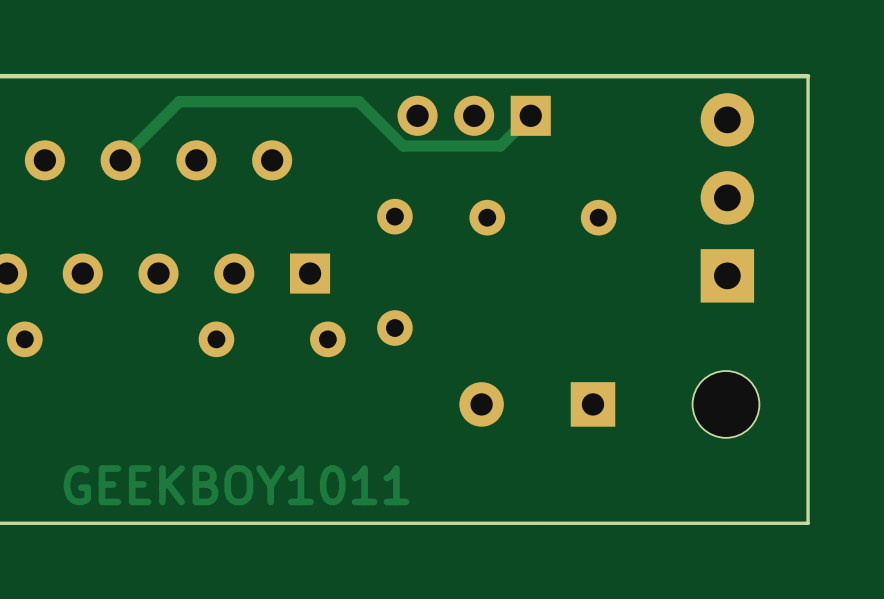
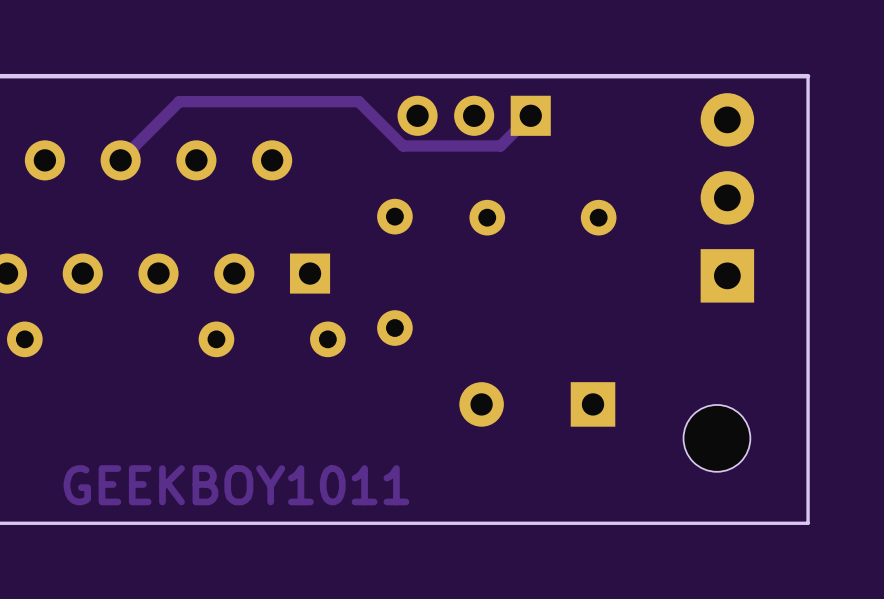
part position: (725, 404) -> (716, 438)

